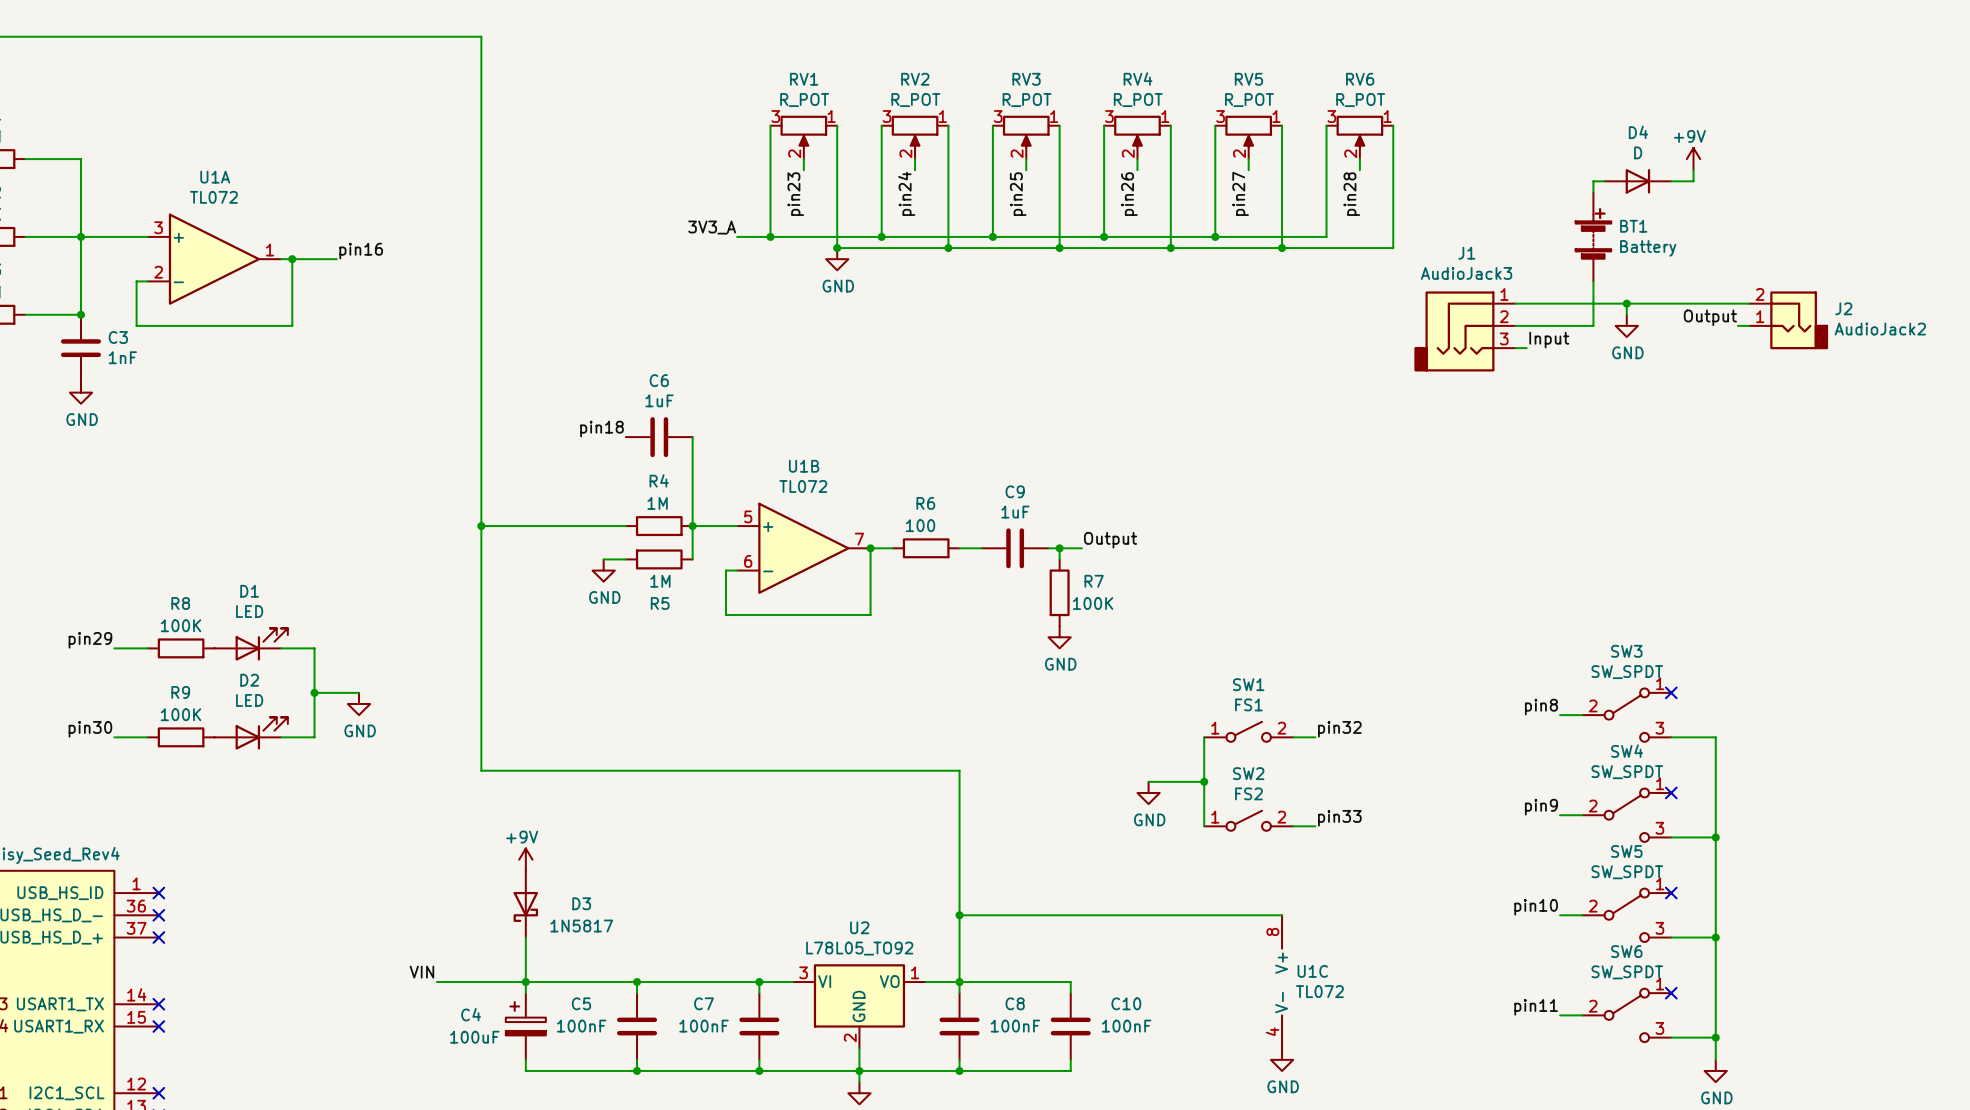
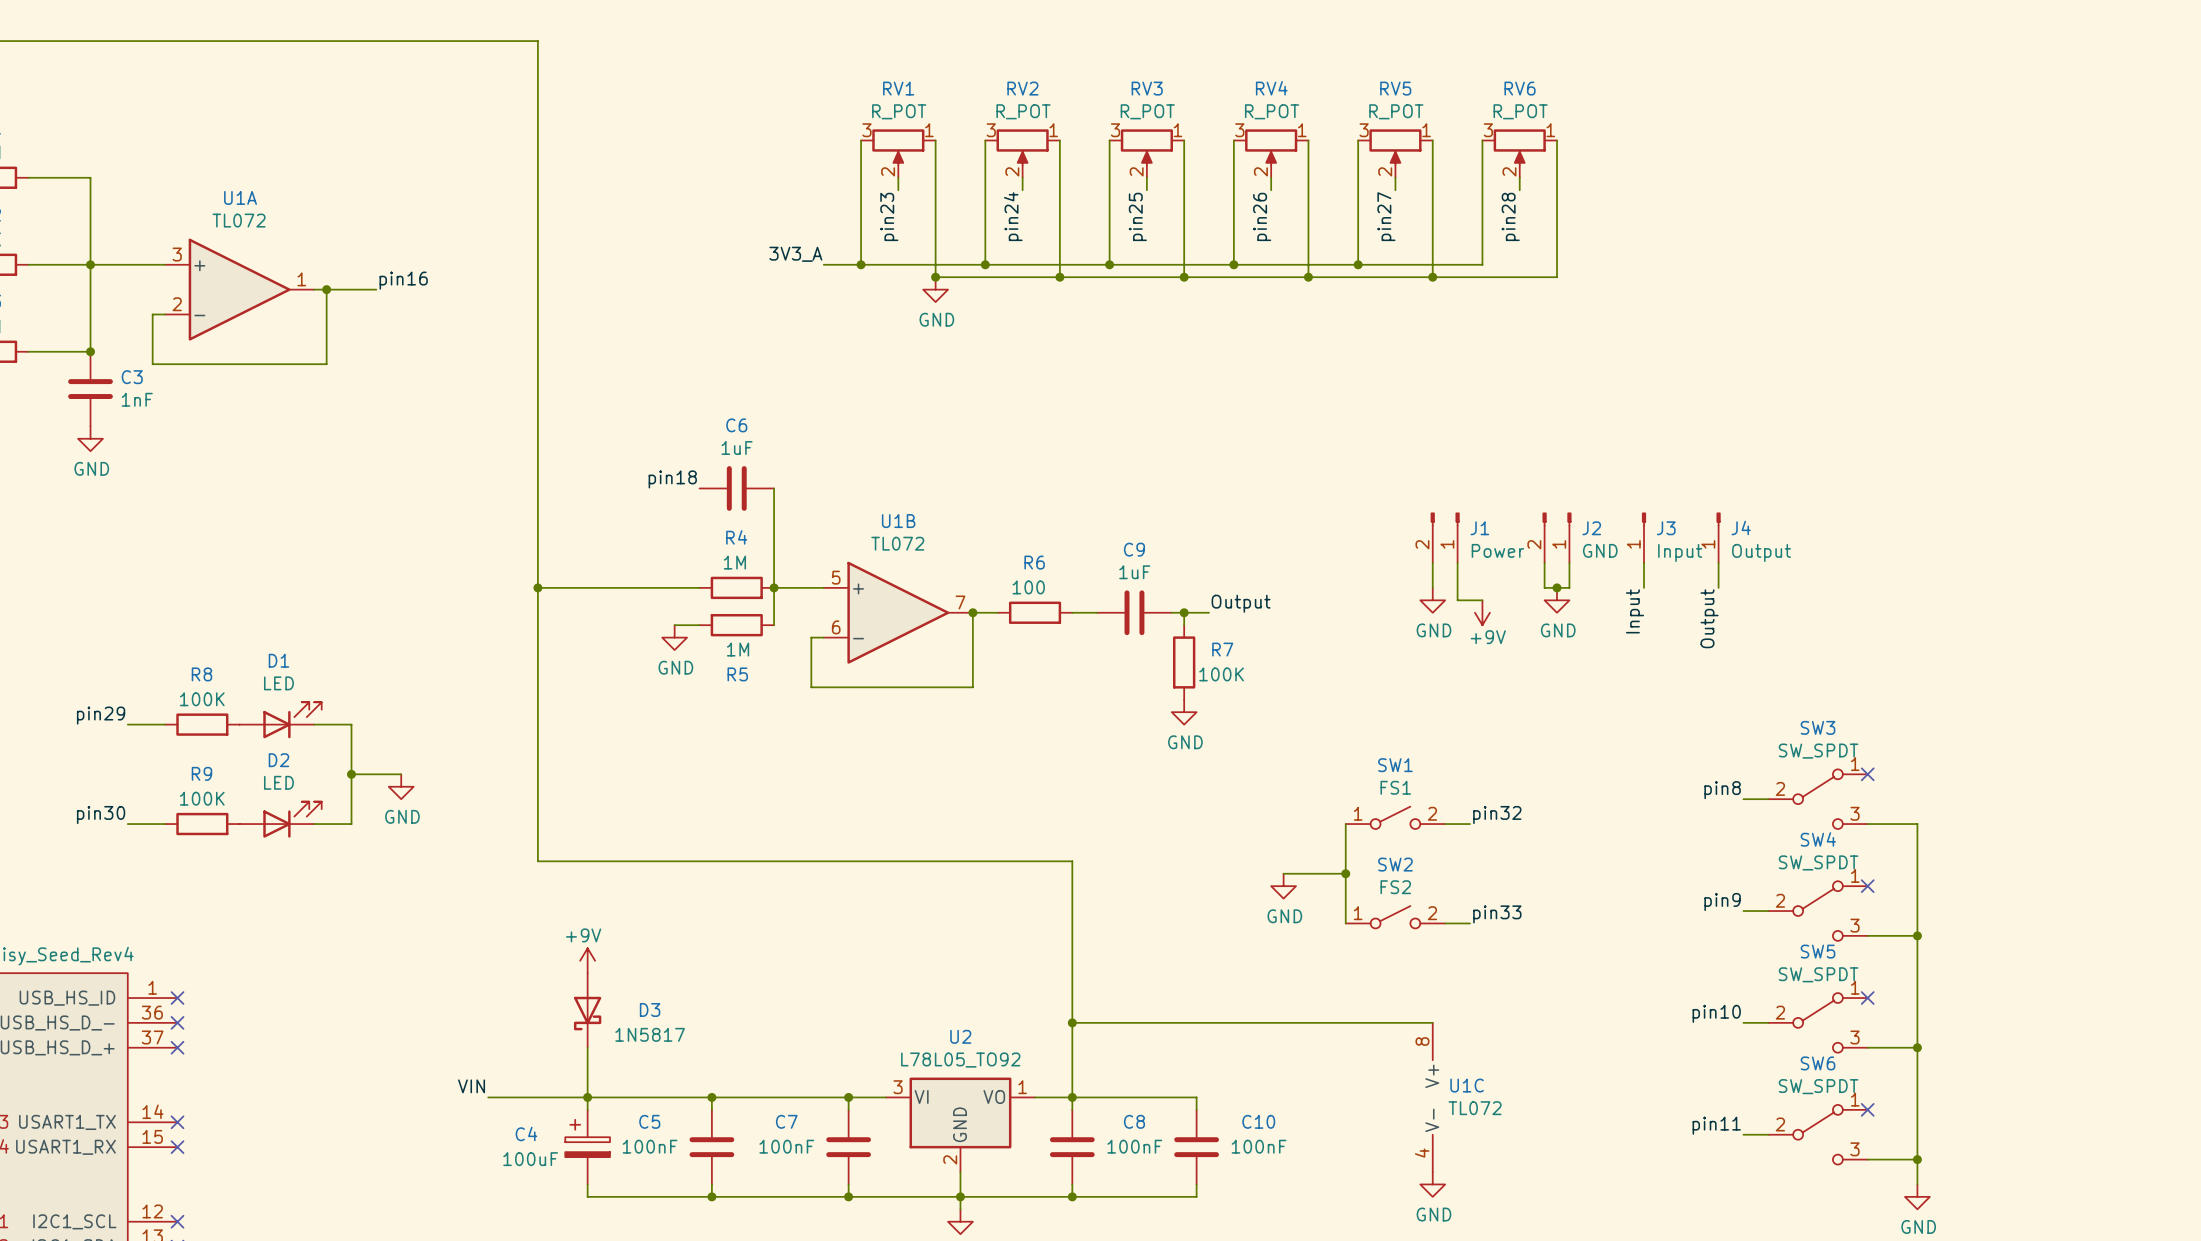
power symbol: +9V (1693, 159) -> none
wire: (1693, 170) (1693, 181) (1671, 181) -> none
wire: (1604, 181) (1593, 181) (1593, 192) -> none
D4: D (1637, 181) -> none
BT1: Battery (1593, 236) -> none
J1 name position: J1 (1466, 253) -> J1 (1479, 528)
J1 value: AudioJack3 (1466, 273) -> Power (1497, 550)
wire: (1593, 281) (1593, 325) (1515, 325) -> none
J1 symbol: [1414, 291, 1516, 372] -> [1430, 512, 1460, 564]
J2 symbol: [1749, 291, 1829, 350] -> [1542, 512, 1572, 564]
wire: (1515, 303) (1749, 303) -> none
wire: (1626, 303) (1626, 314) -> none
junction: (1626, 303) -> none
J2 name position: J2 (1843, 308) -> J2 (1591, 528)
label: Output (1710, 317) -> none
power symbol: GND (1626, 325) -> none
wire: (1738, 325) (1749, 325) -> none
J2 value: AudioJack2 (1880, 329) -> GND (1600, 550)
label rotation: 0° (1549, 340) -> 90° counterclockwise (1634, 611)
label position: Input (1549, 340) -> Input (1634, 611)
wire: (1515, 348) (1526, 348) -> none
J3: none -> Input (1644, 537)
J4: none -> Output (1718, 537)
wire: none -> (1432, 563) (1432, 587)
wire: none -> (1457, 563) (1457, 600) (1482, 600)
wire: none -> (1544, 563) (1544, 587) (1569, 587) (1569, 563)
wire: none -> (1644, 563) (1644, 587)
wire: none -> (1718, 563) (1718, 587)
junction: none -> (1557, 587)
power symbol: none -> GND (1432, 600)
power symbol: none -> GND (1557, 600)
power symbol: none -> +9V (1482, 612)
label: none -> Output (1709, 618)

